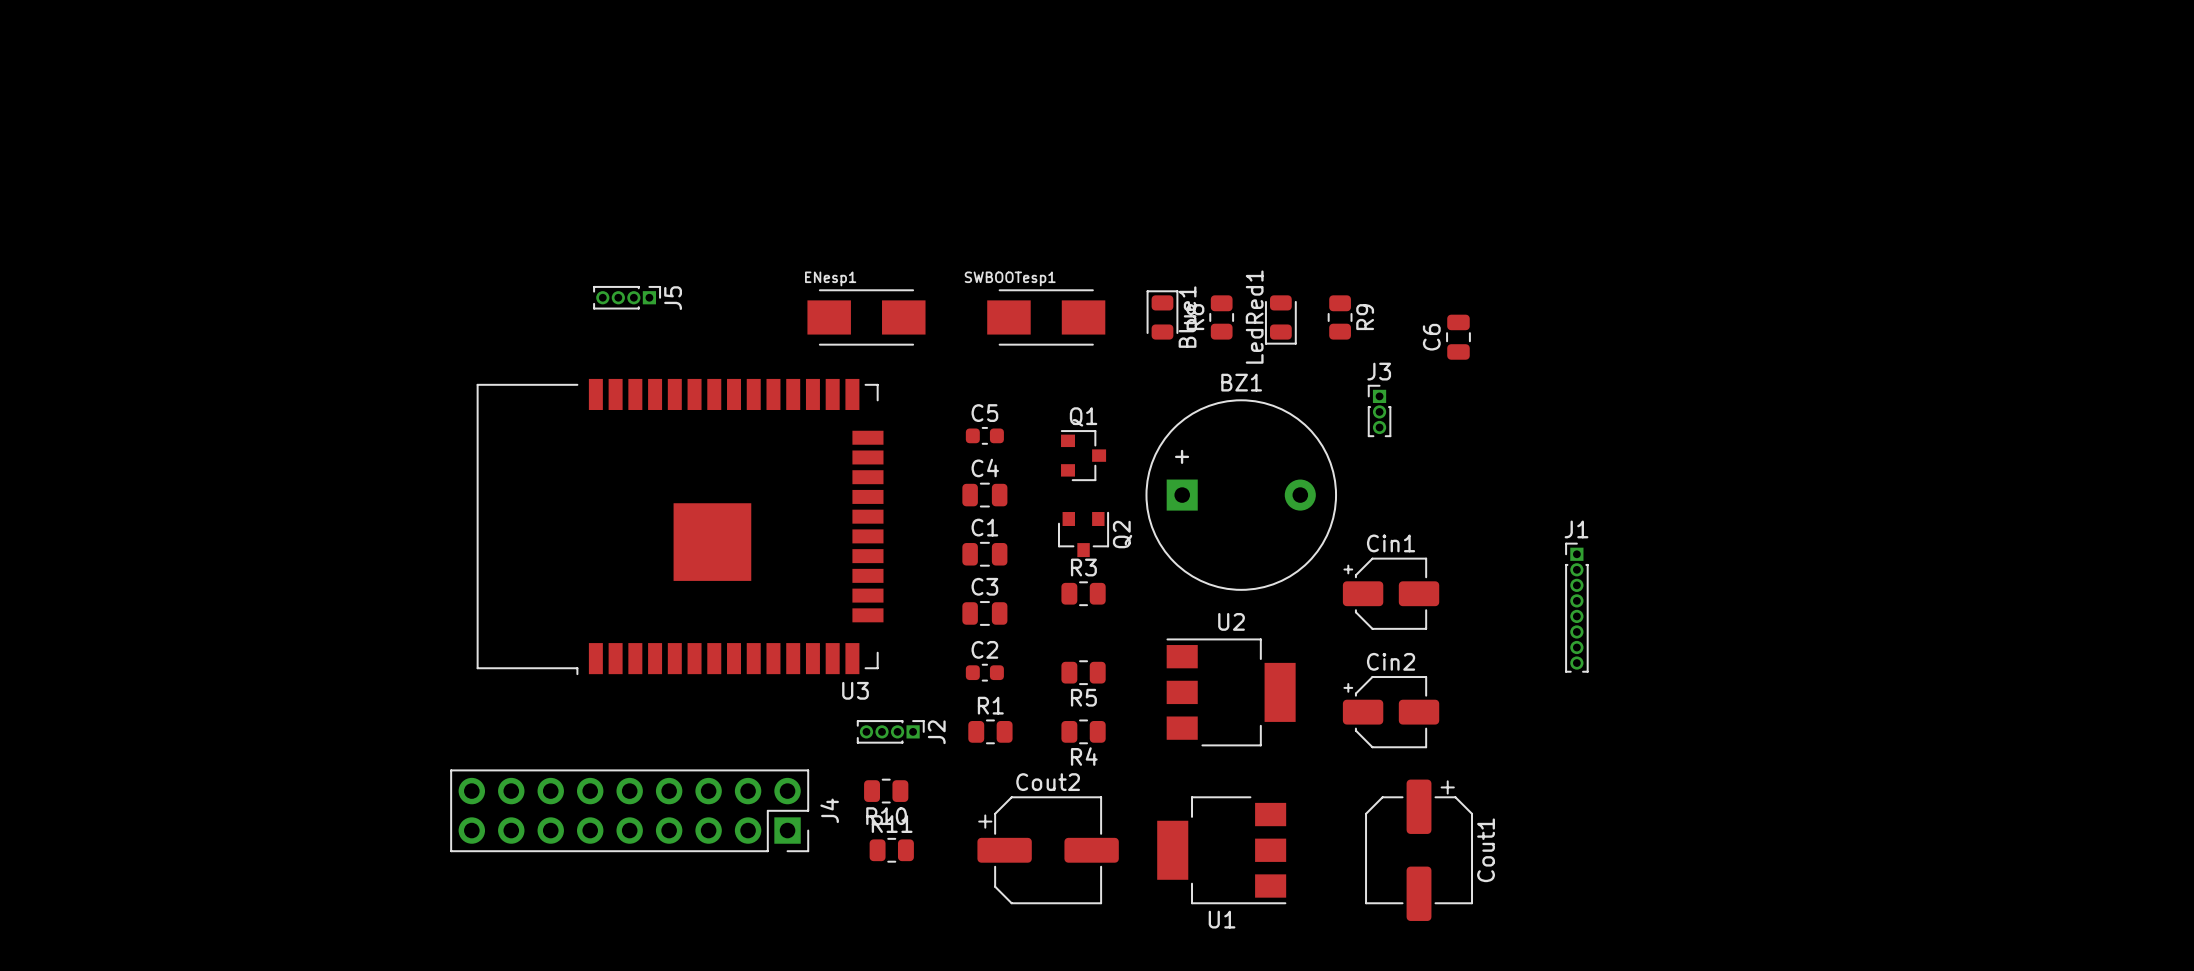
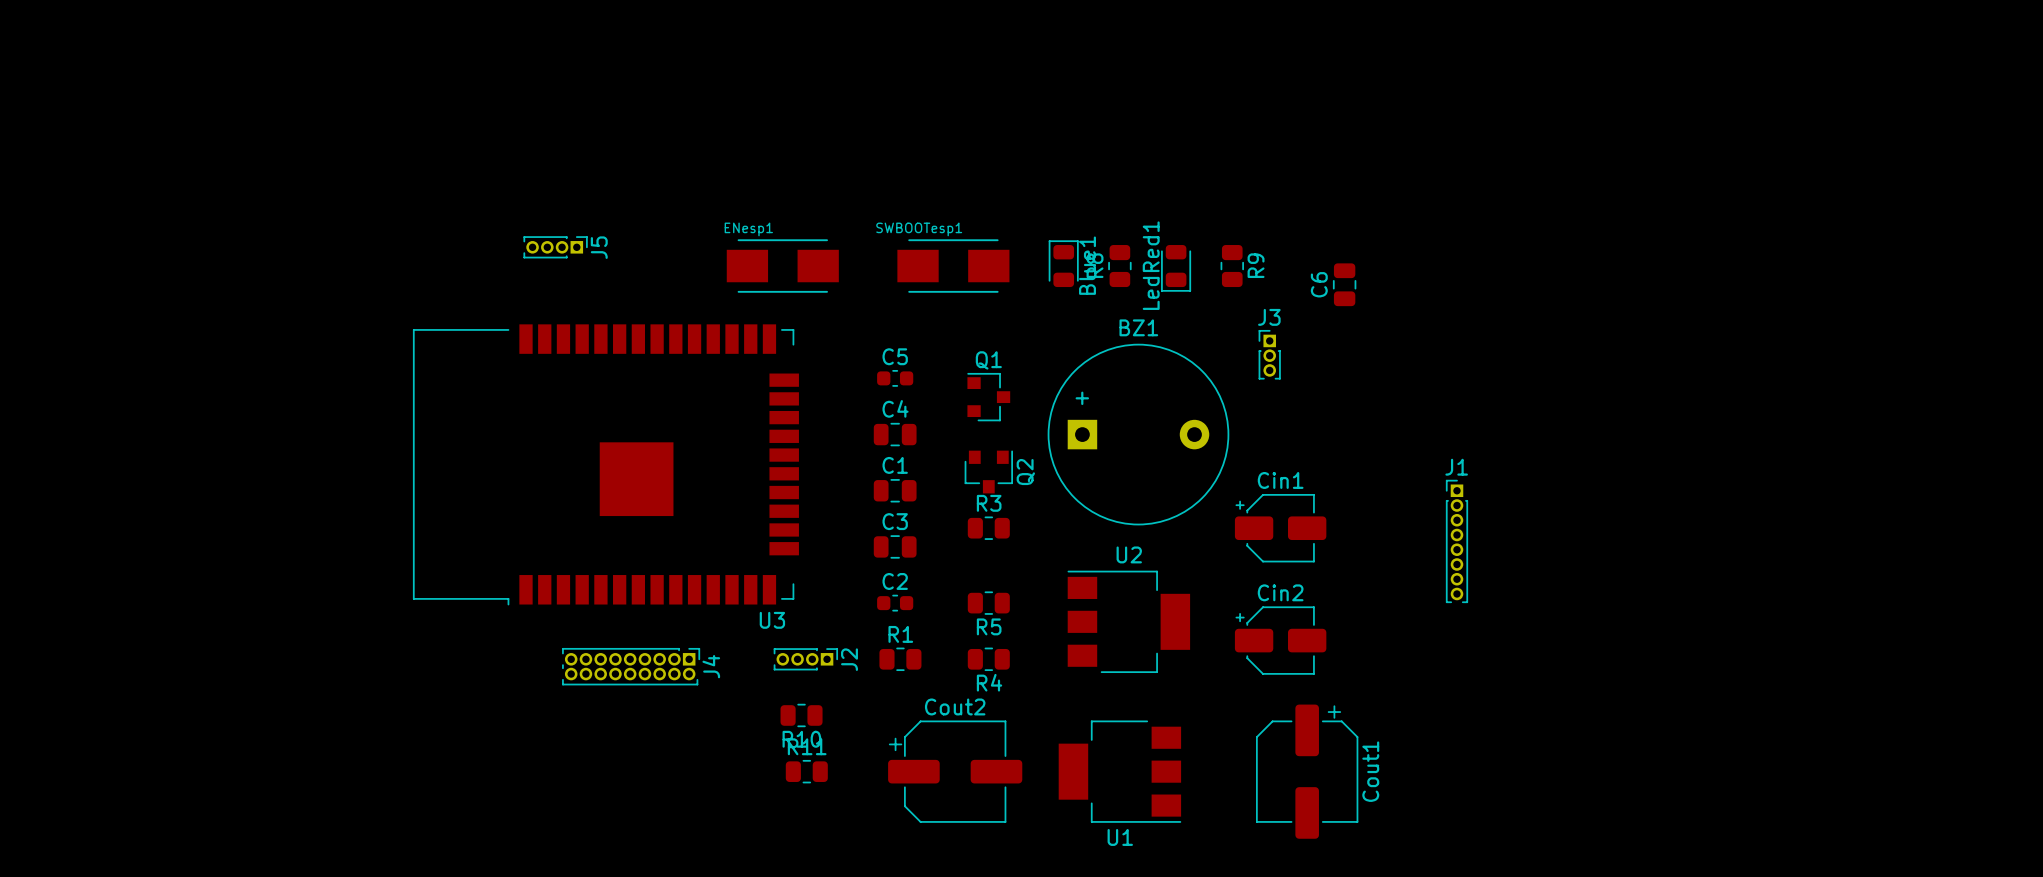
J4 footprint: [450, 769, 810, 853] -> [562, 647, 701, 686]
J4 name position: J4 (829, 810) -> J4 (711, 666)

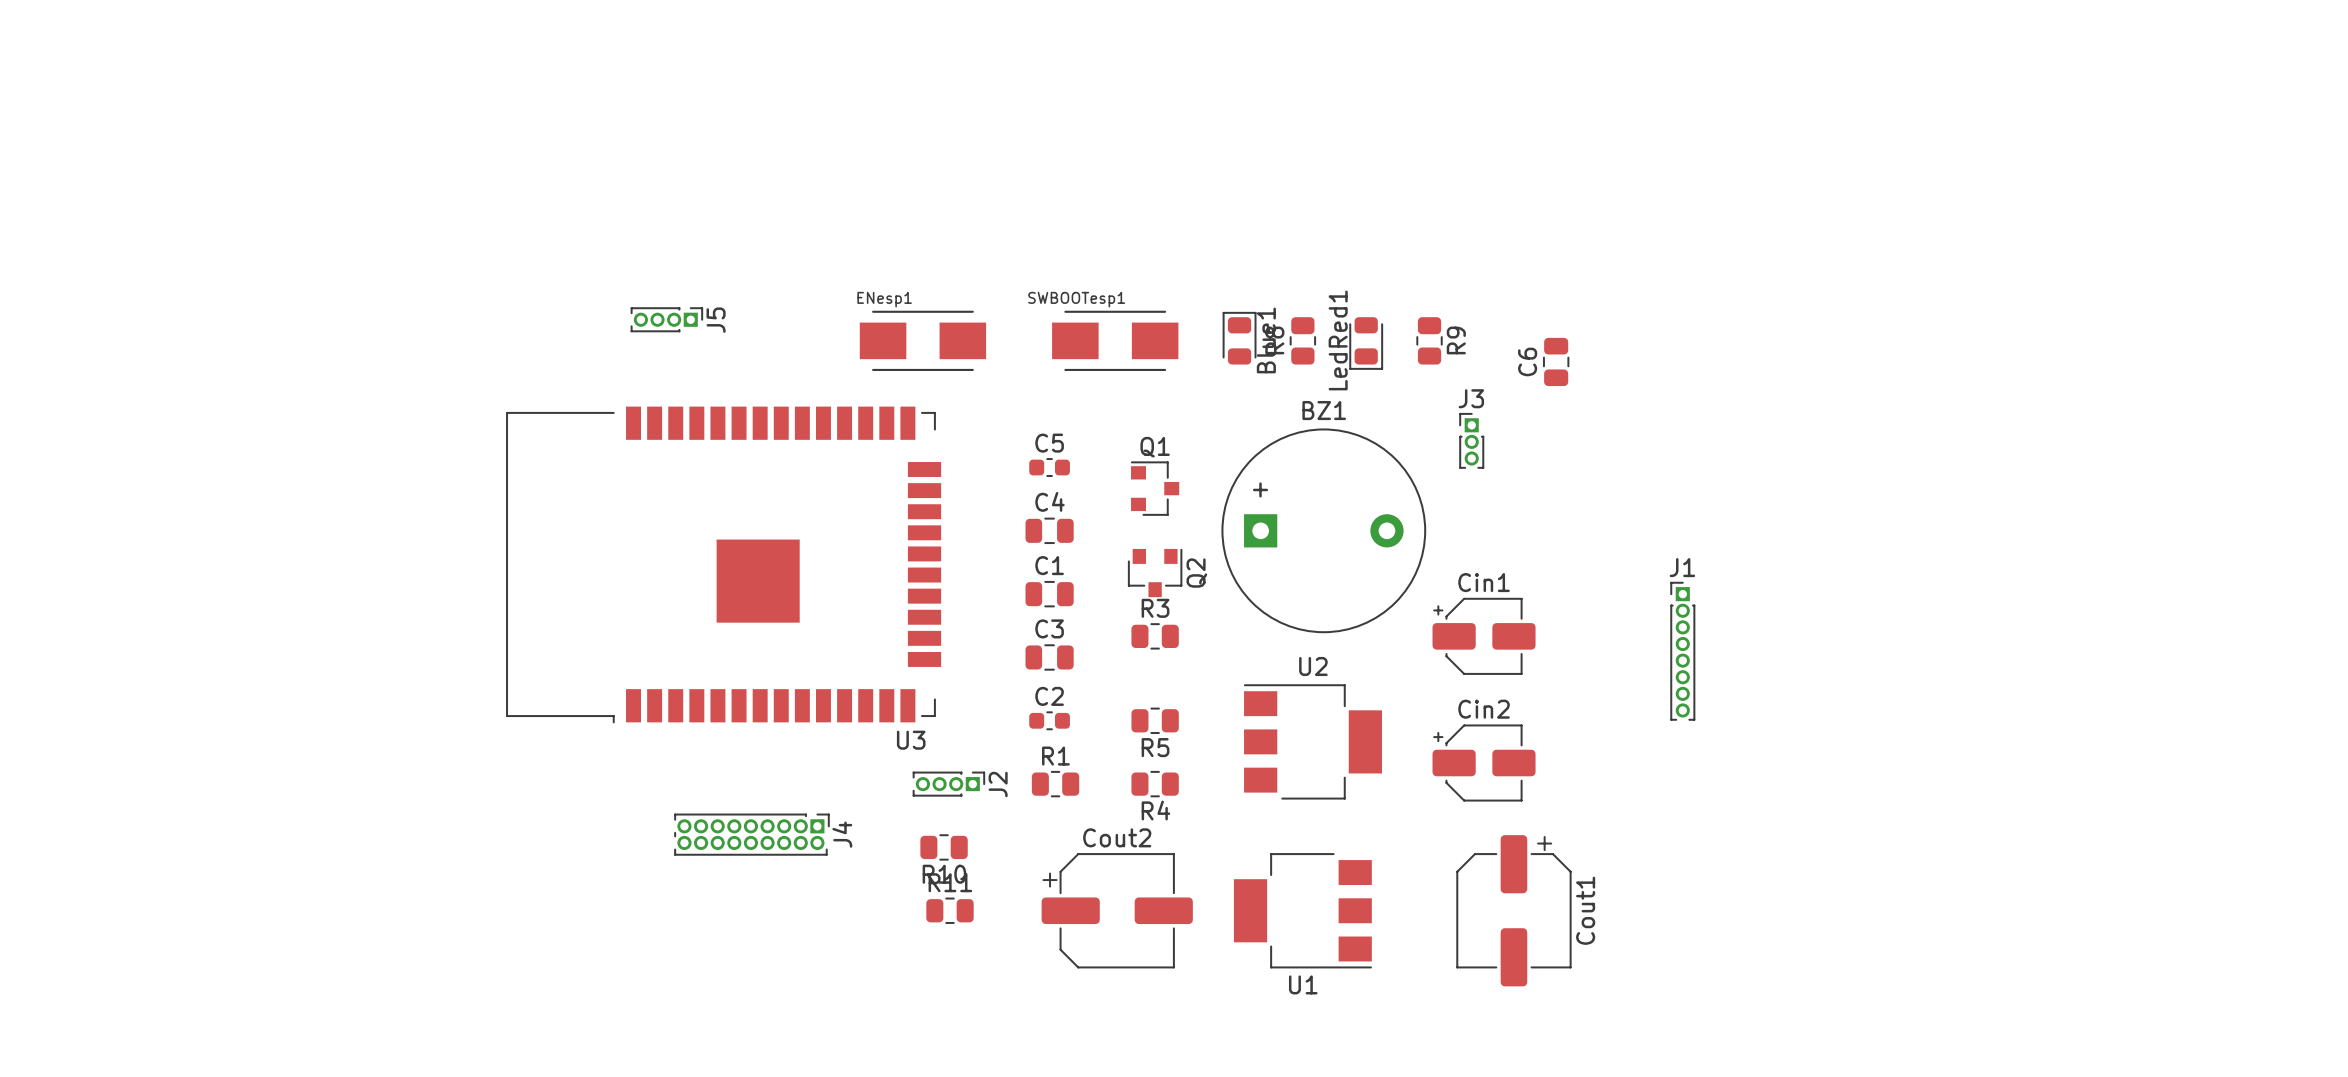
J4 position: (631, 666) -> (751, 834)

